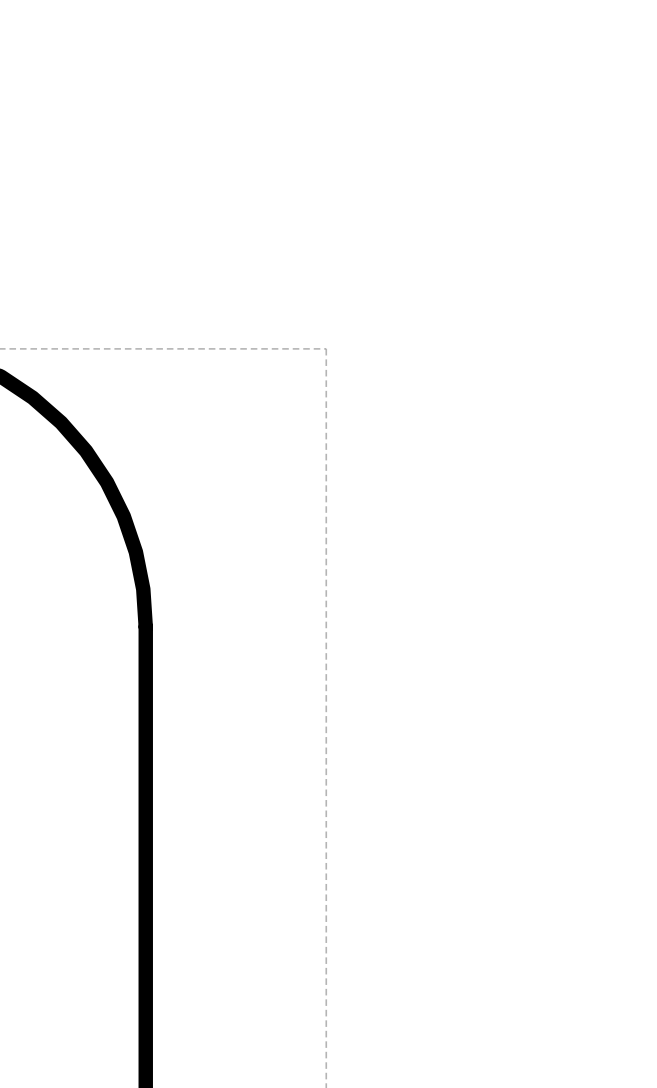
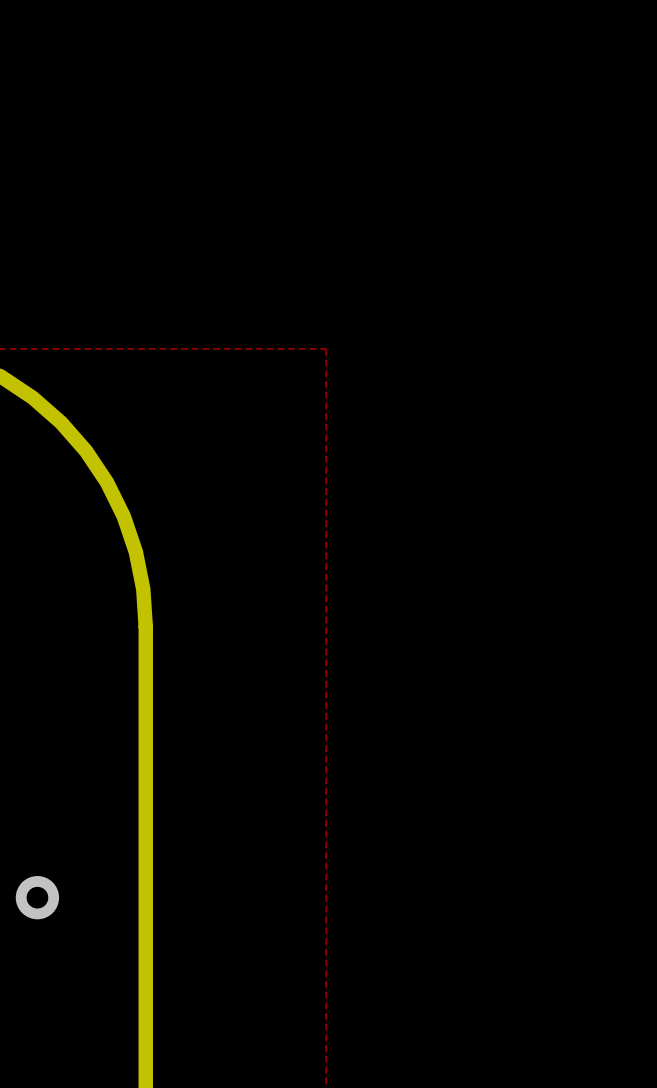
via: none -> (37, 897)

